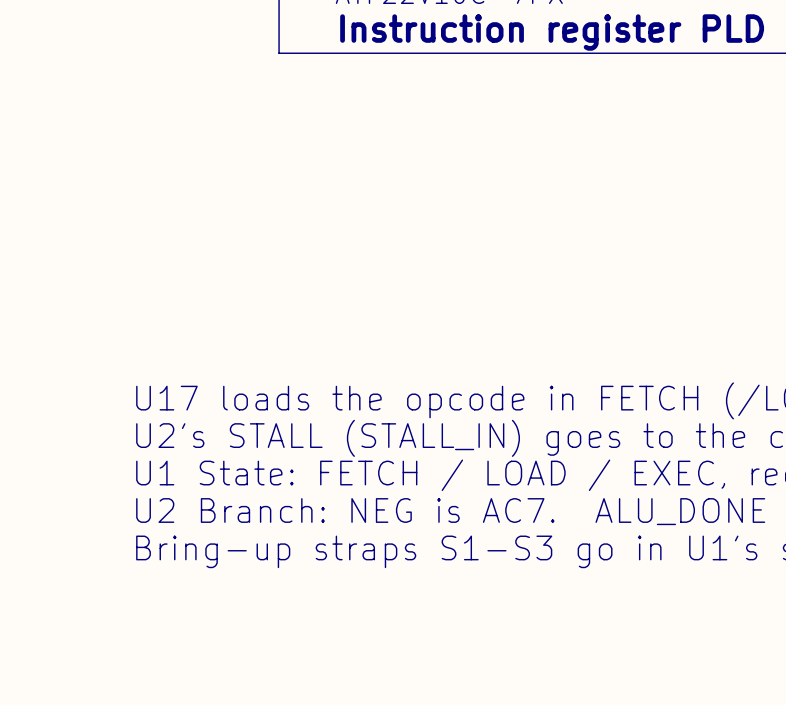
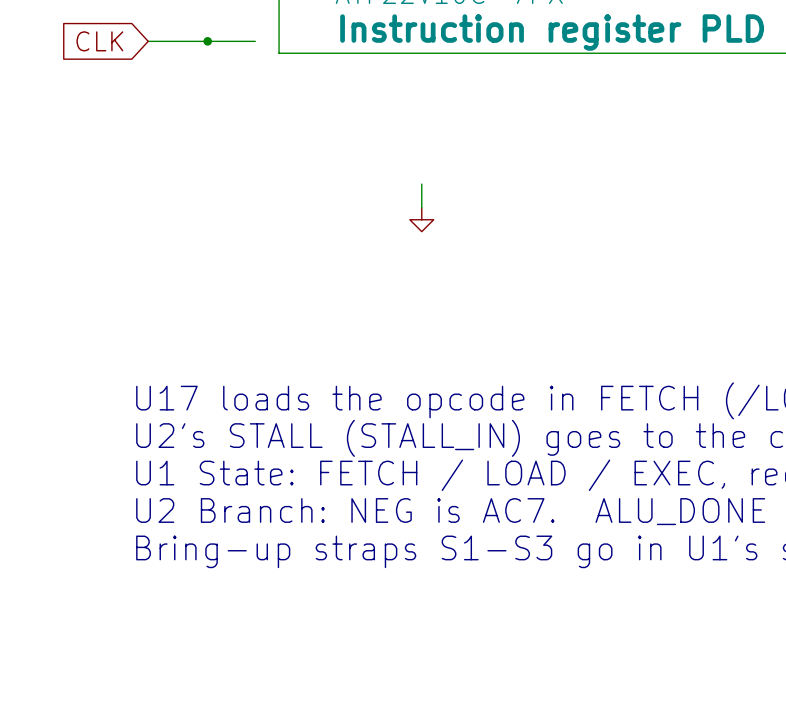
global label: none -> CLK (99, 41)
wire: none -> (148, 41) (255, 41)
junction: none -> (207, 41)
wire: none -> (421, 184) (421, 207)
power symbol: none -> (421, 219)

